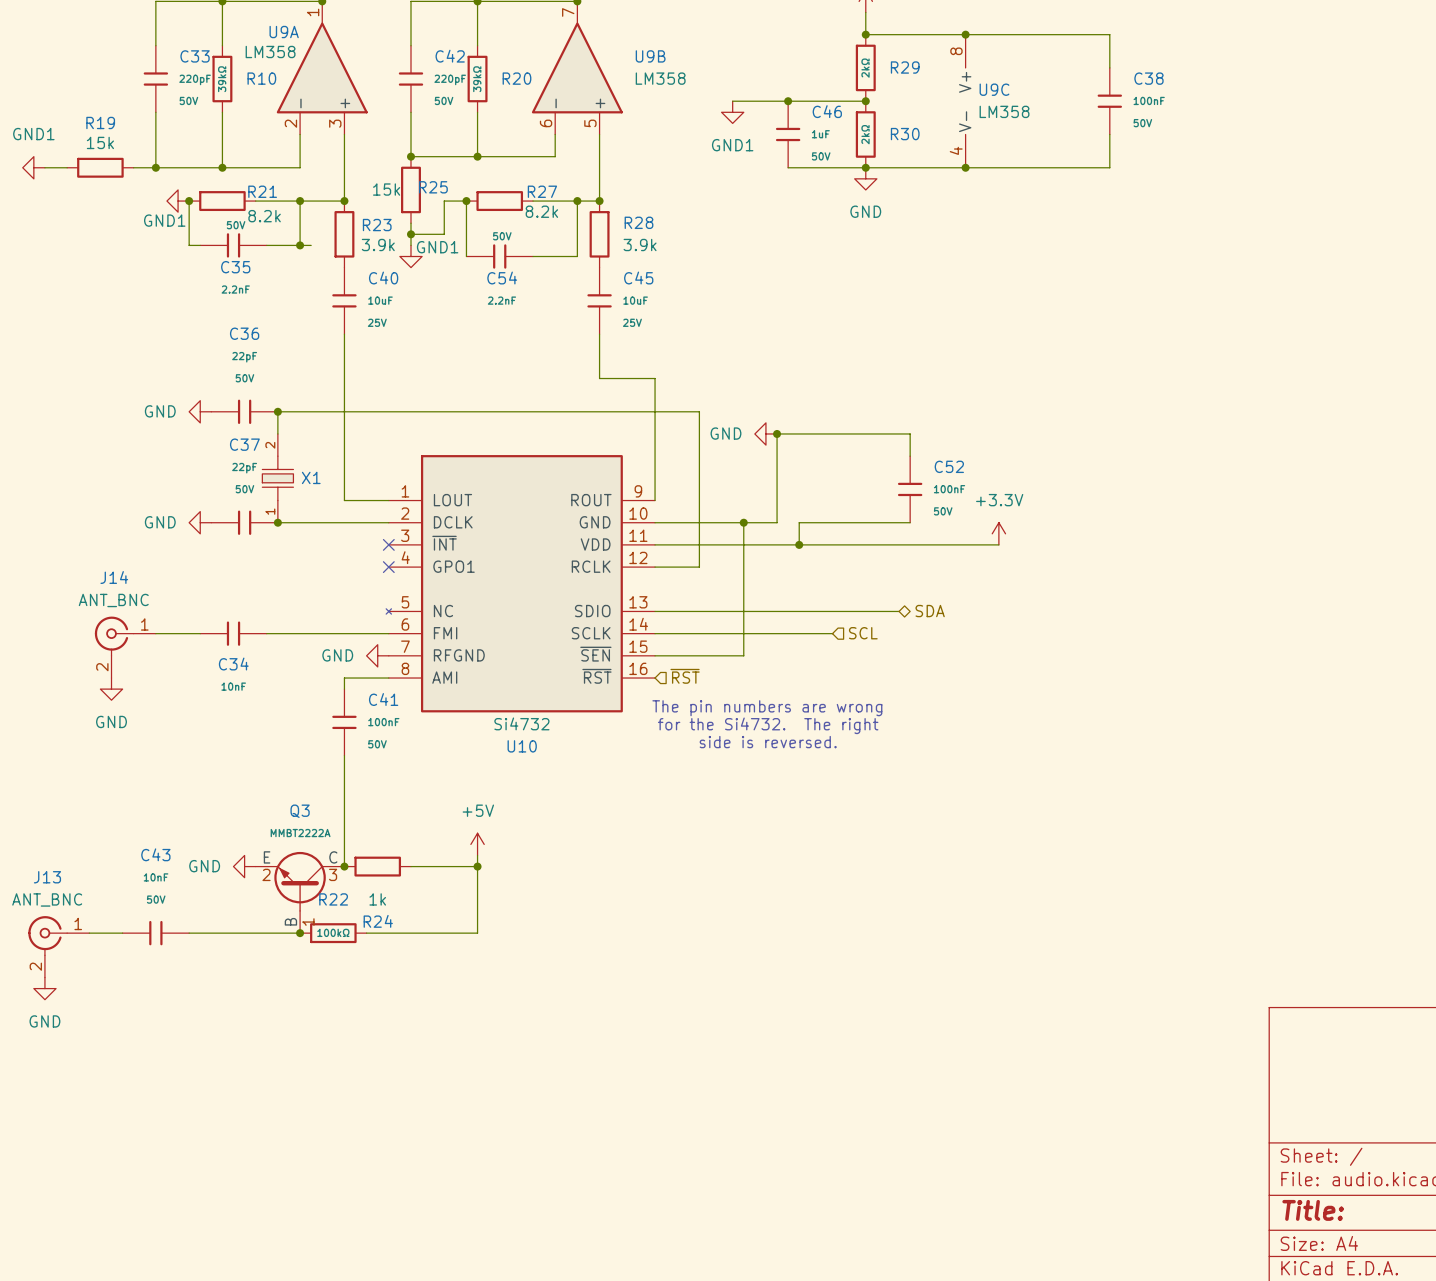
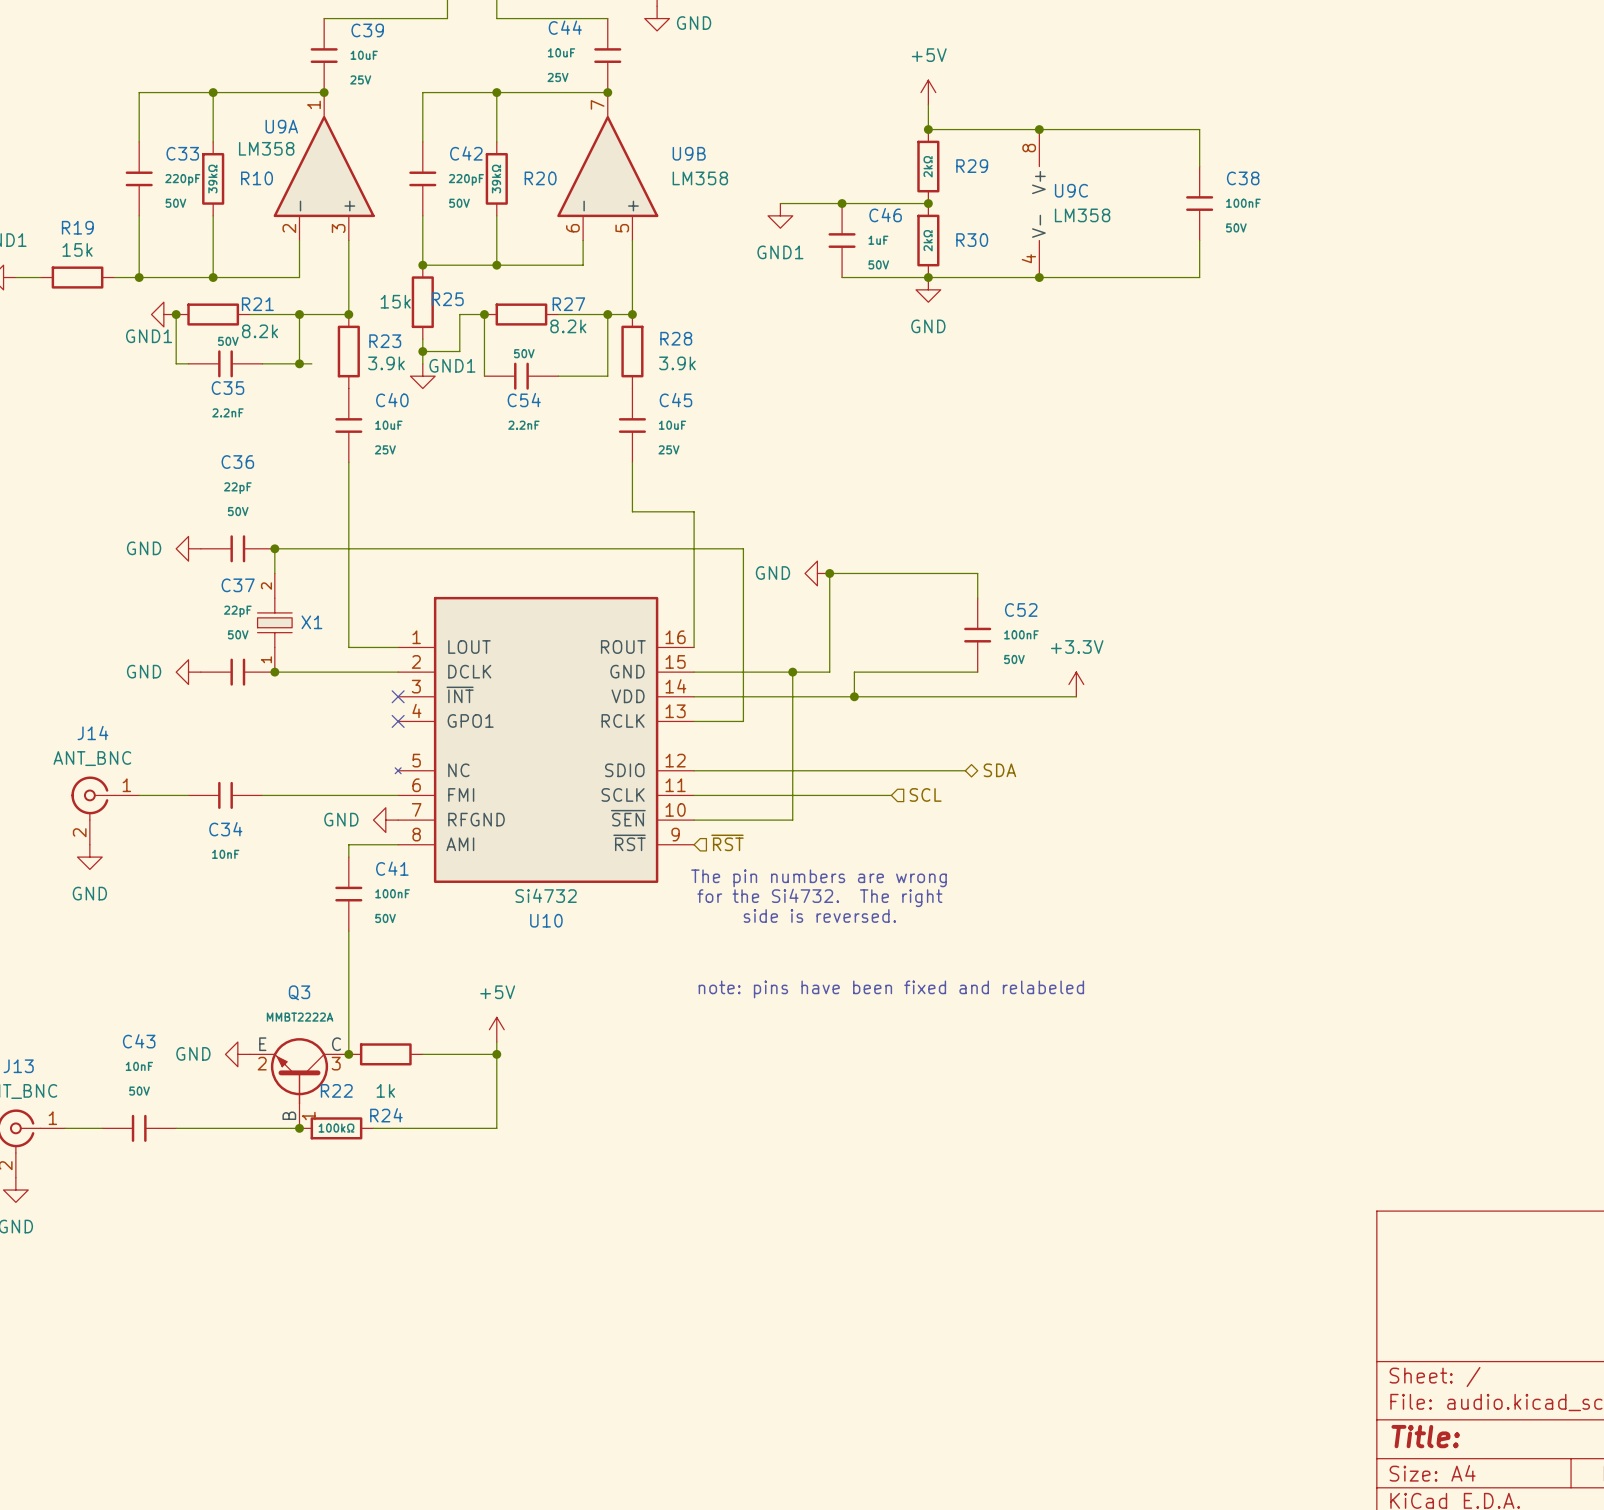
U10 pin number: 9 (638, 491) -> 16 (675, 637)
U10 pin number: 10 (638, 513) -> 15 (675, 661)
U10 pin number: 11 (638, 535) -> 14 (675, 686)
U10 pin number: 12 (638, 557) -> 13 (675, 711)
U10 pin number: 13 (638, 602) -> 12 (675, 760)
U10 pin number: 14 (638, 624) -> 11 (675, 785)
U10 pin number: 15 (638, 646) -> 10 (675, 809)
U10 pin number: 16 (638, 668) -> 9 (675, 834)
text: none -> note: pins have been fixed and relabeled (891, 989)

